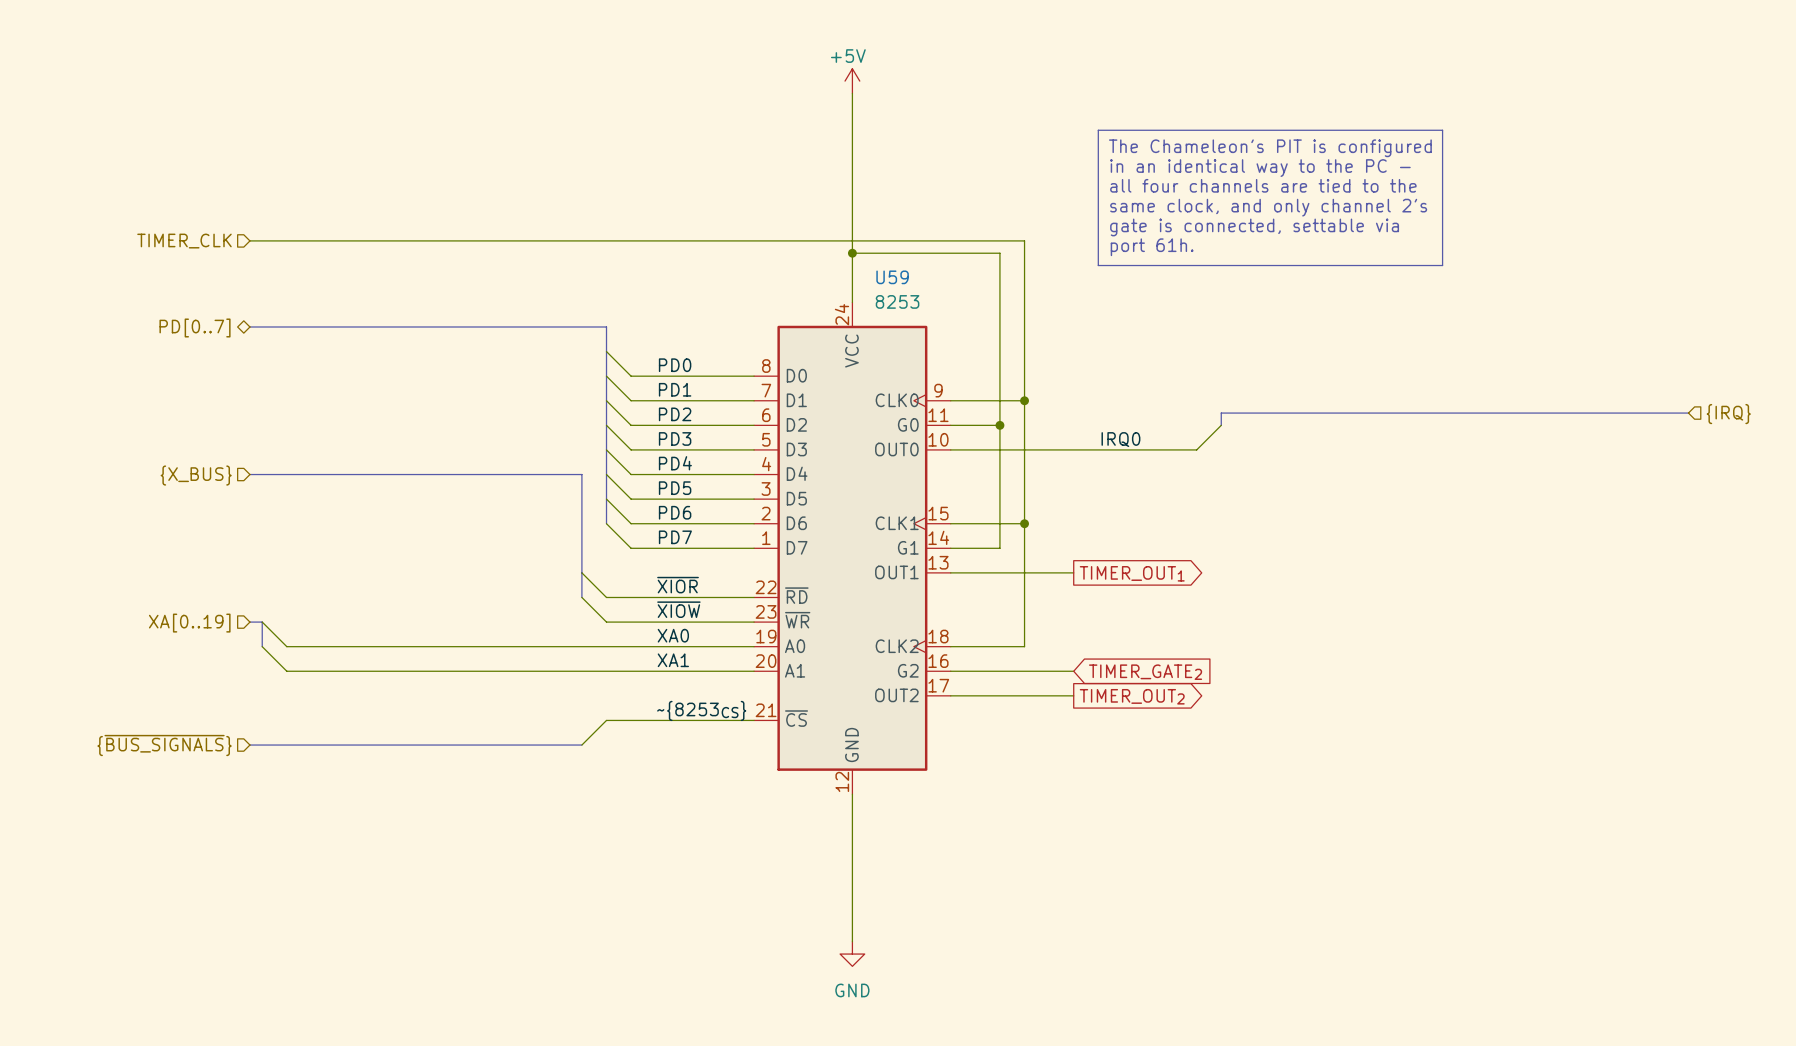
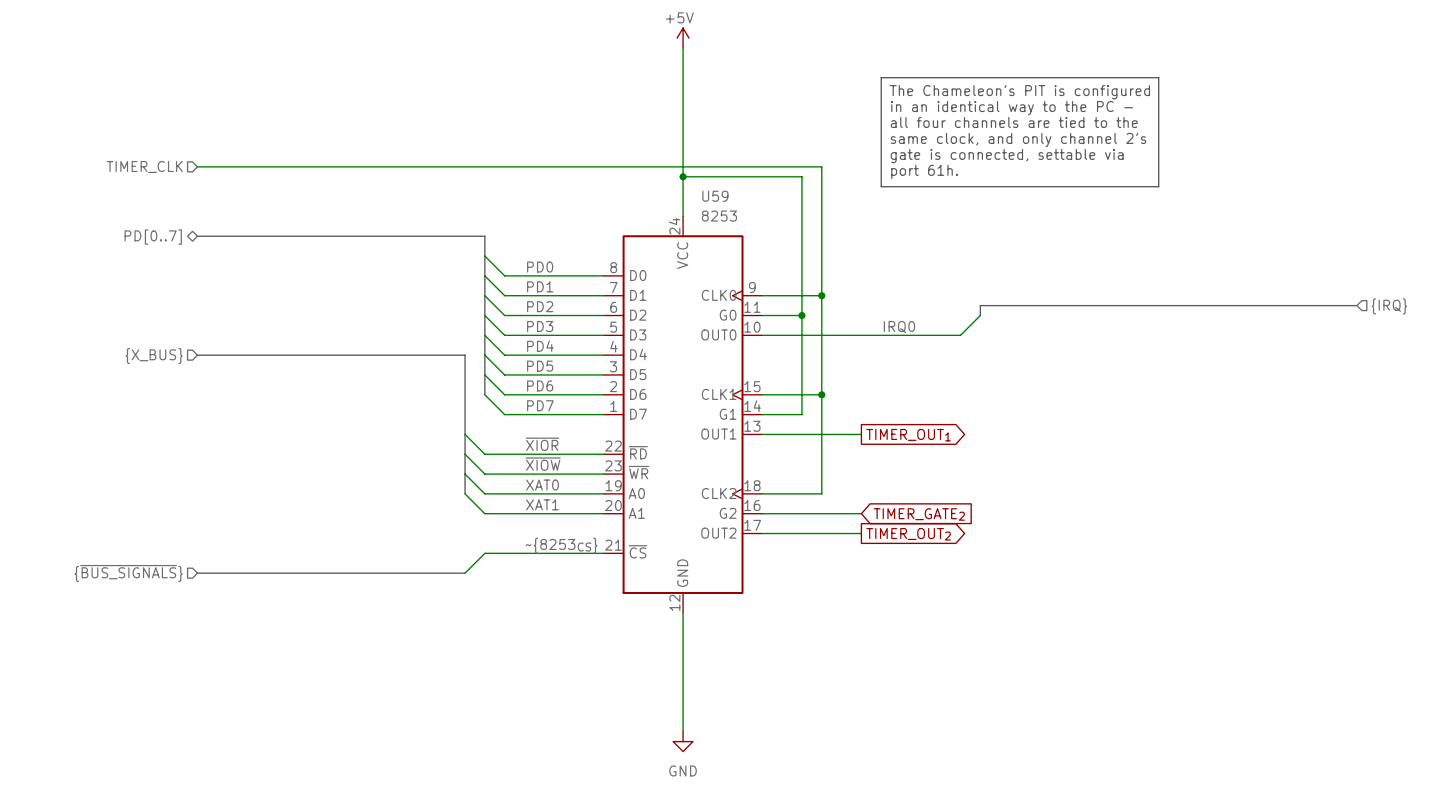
bus: none -> (465, 454) (465, 493)
bus: (249, 622) (262, 622) (262, 646) -> none
wire: (262, 622) (286, 646) (606, 646) -> (465, 474) (484, 493)
hierarchical label: XA[0..19] (189, 623) -> none
label: XA0 (673, 635) -> XAT0 (542, 485)
wire: (262, 646) (286, 671) (606, 671) -> (465, 493) (484, 513)
label: XA1 (673, 660) -> XAT1 (542, 504)

